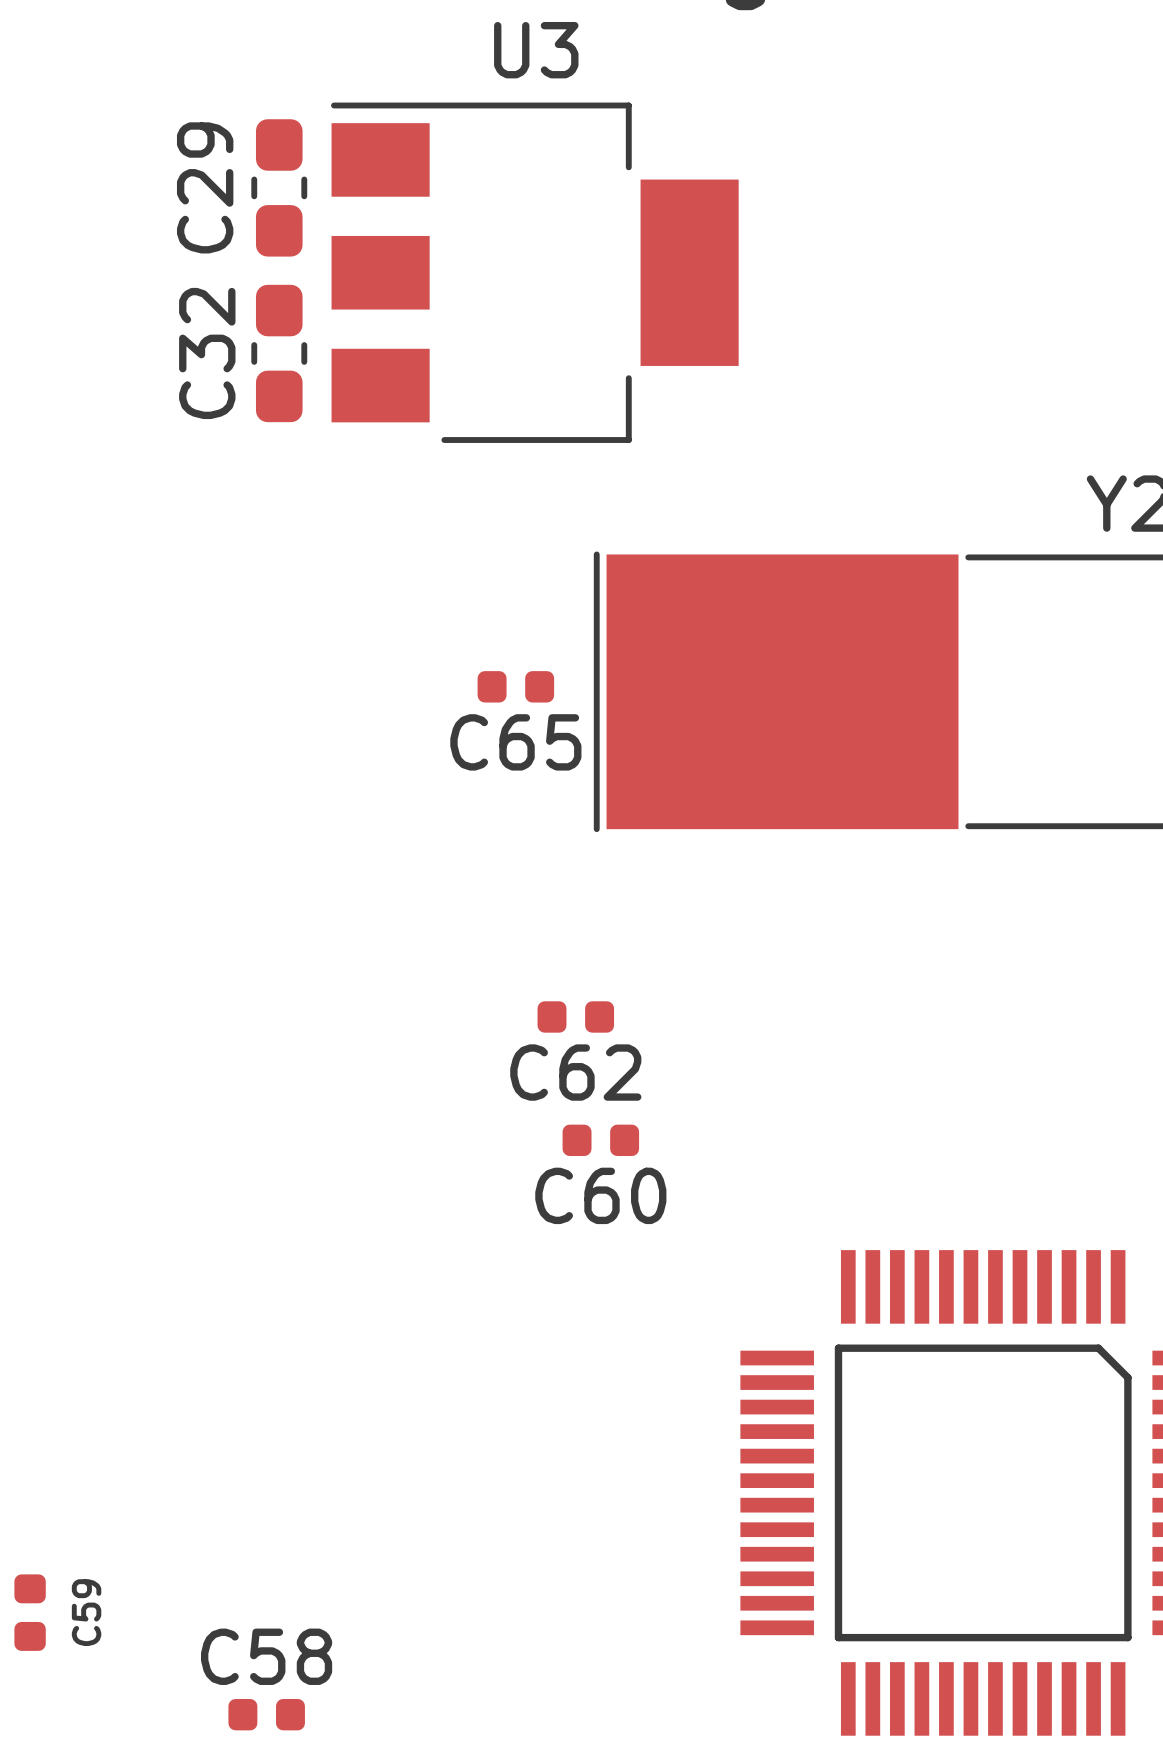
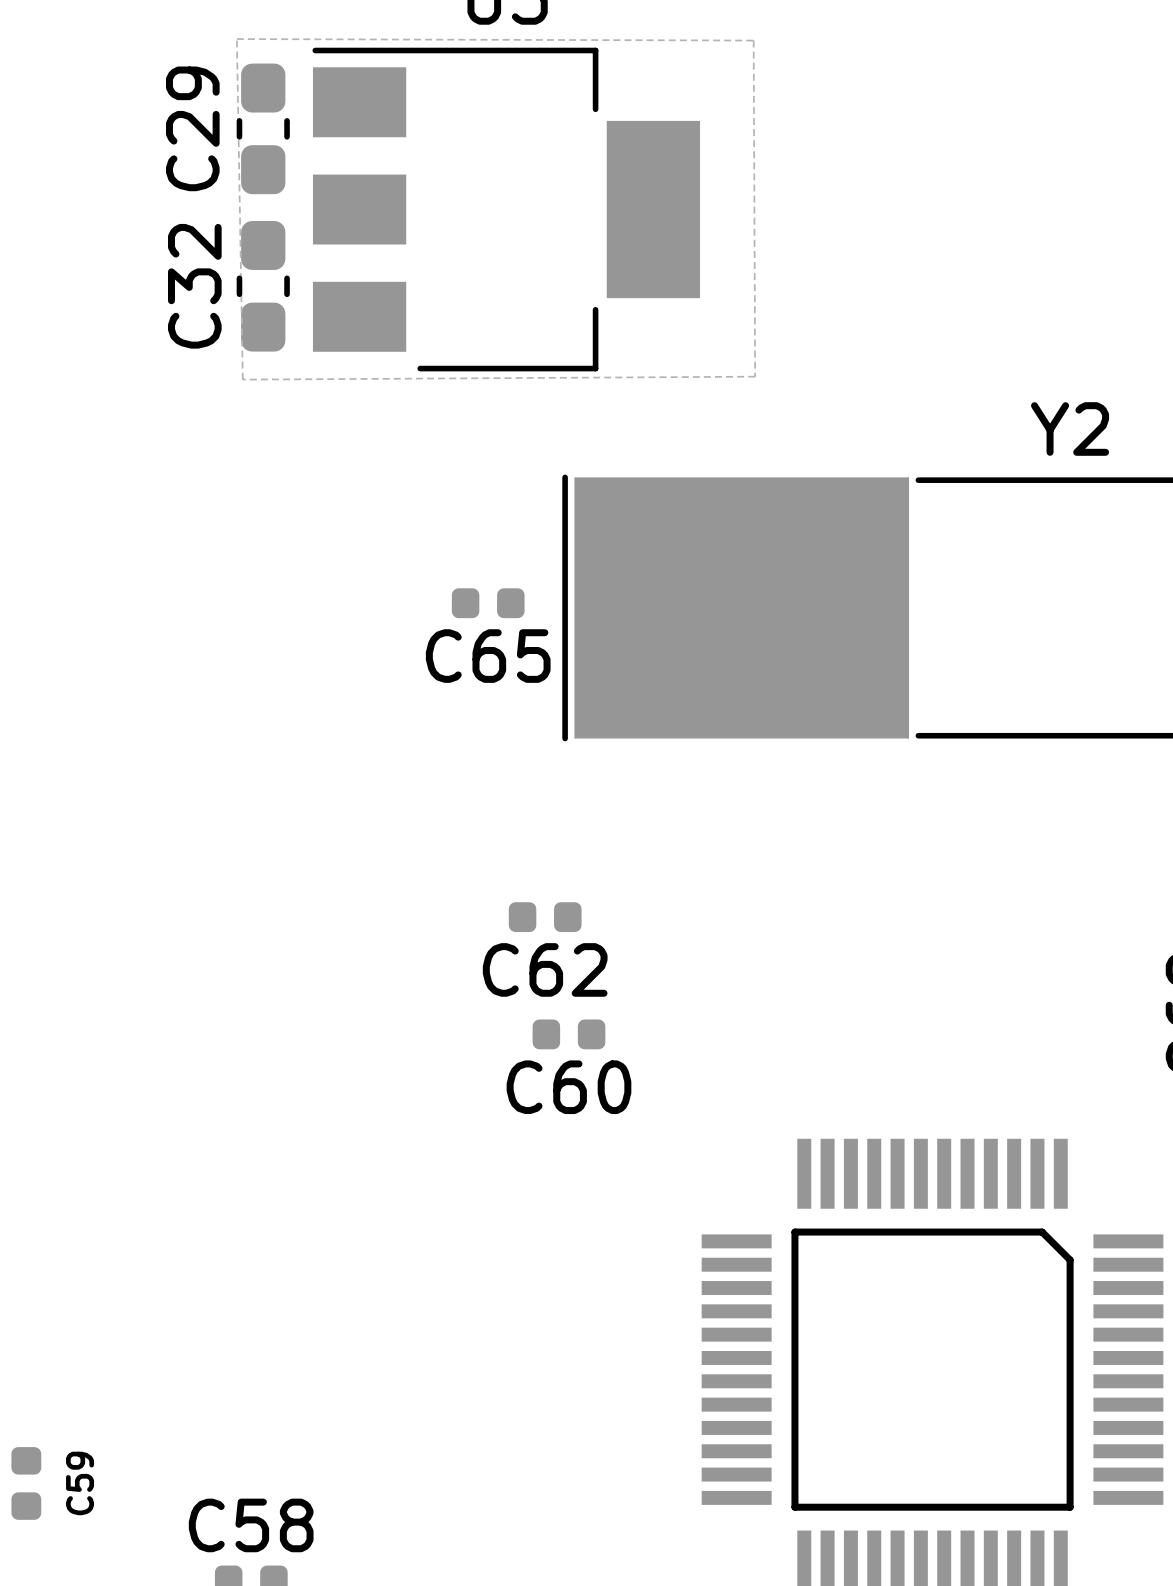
zone outline: none -> (236, 39) (242, 379) (755, 376) (753, 40) (236, 39)

